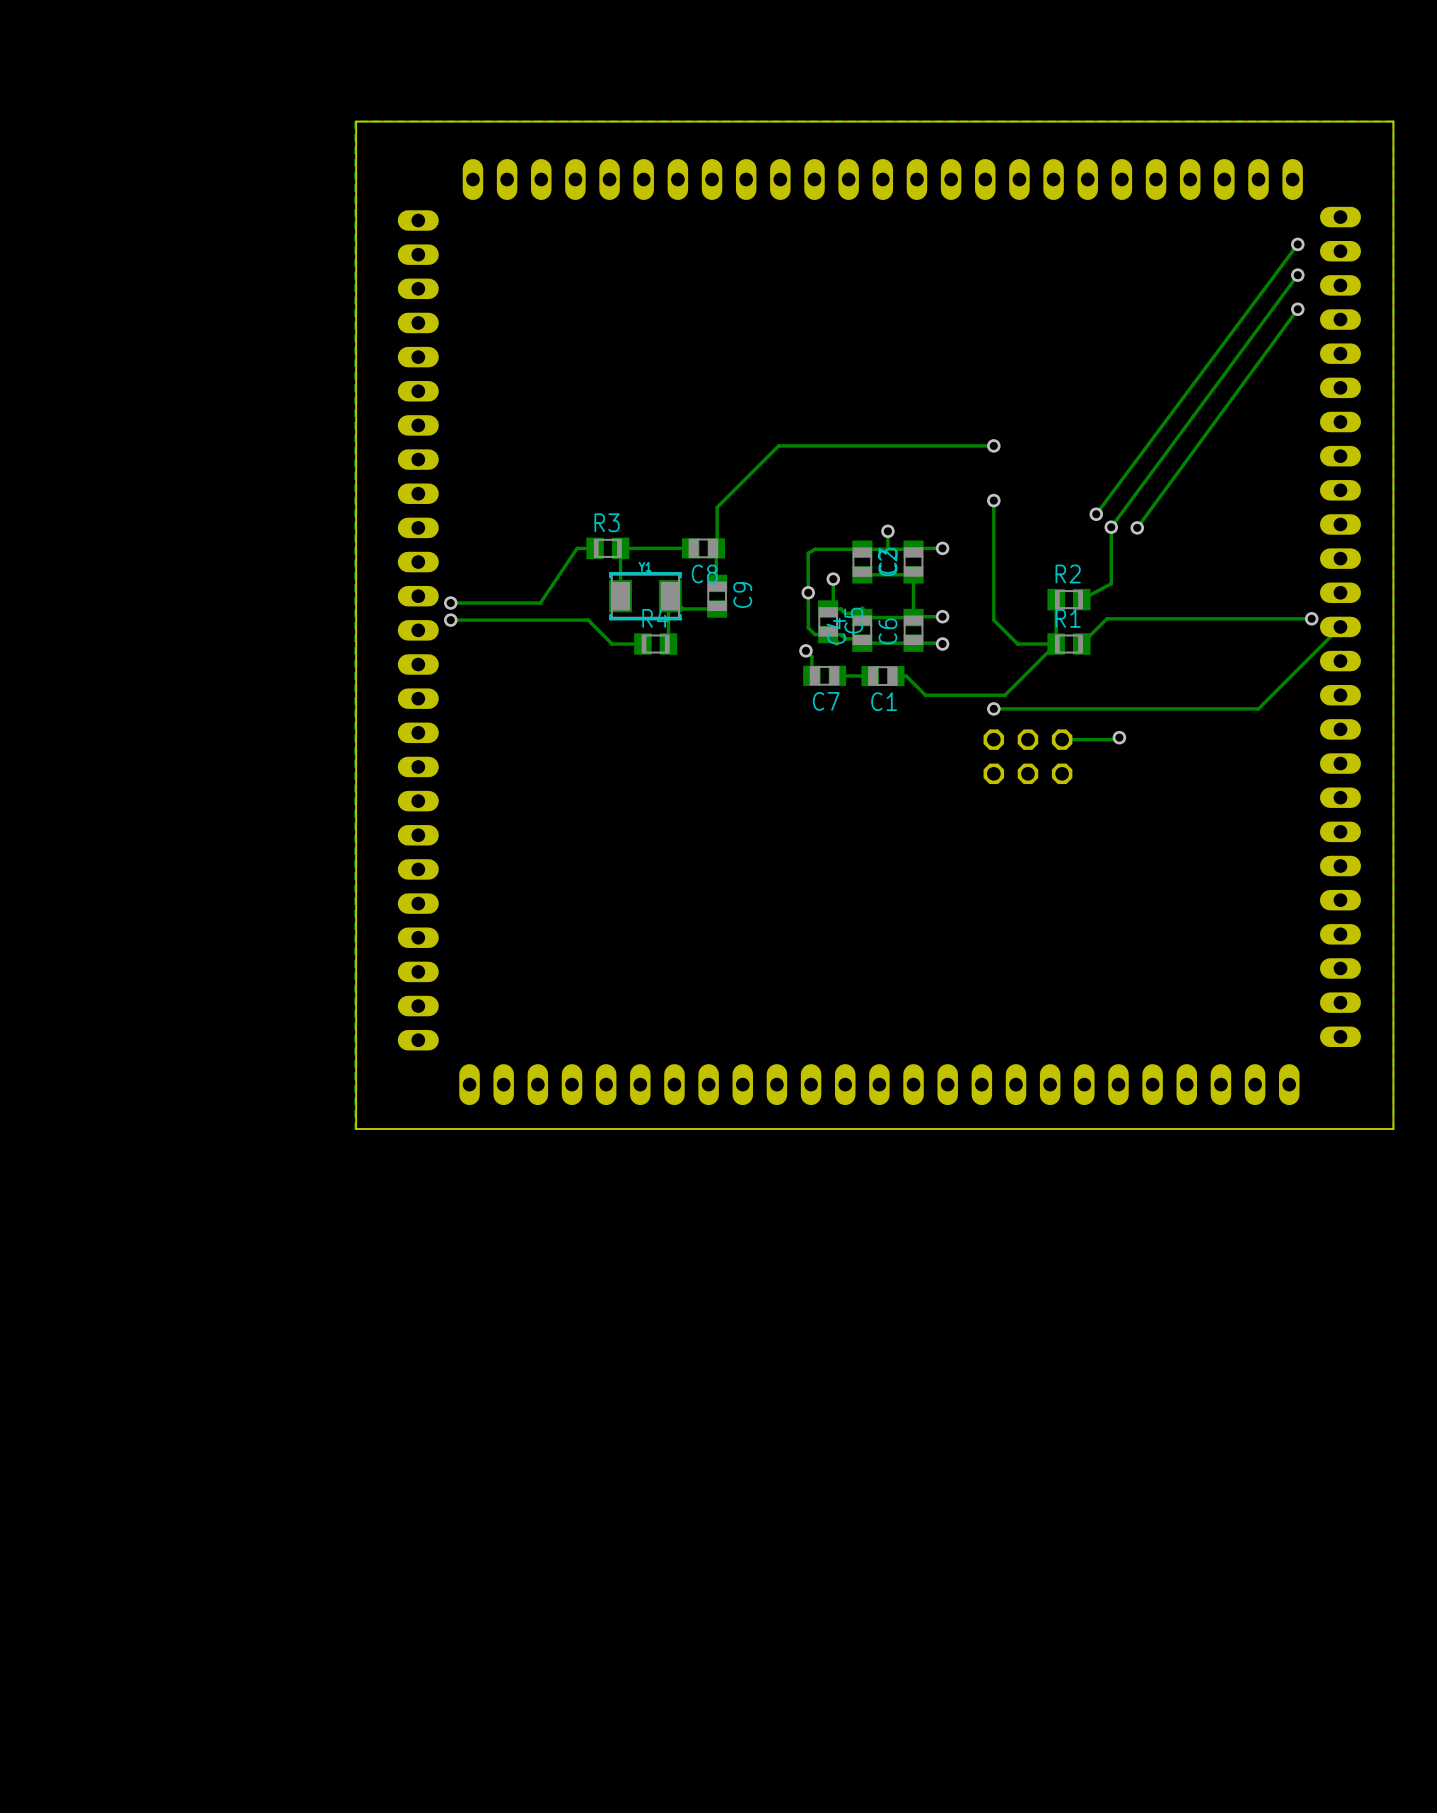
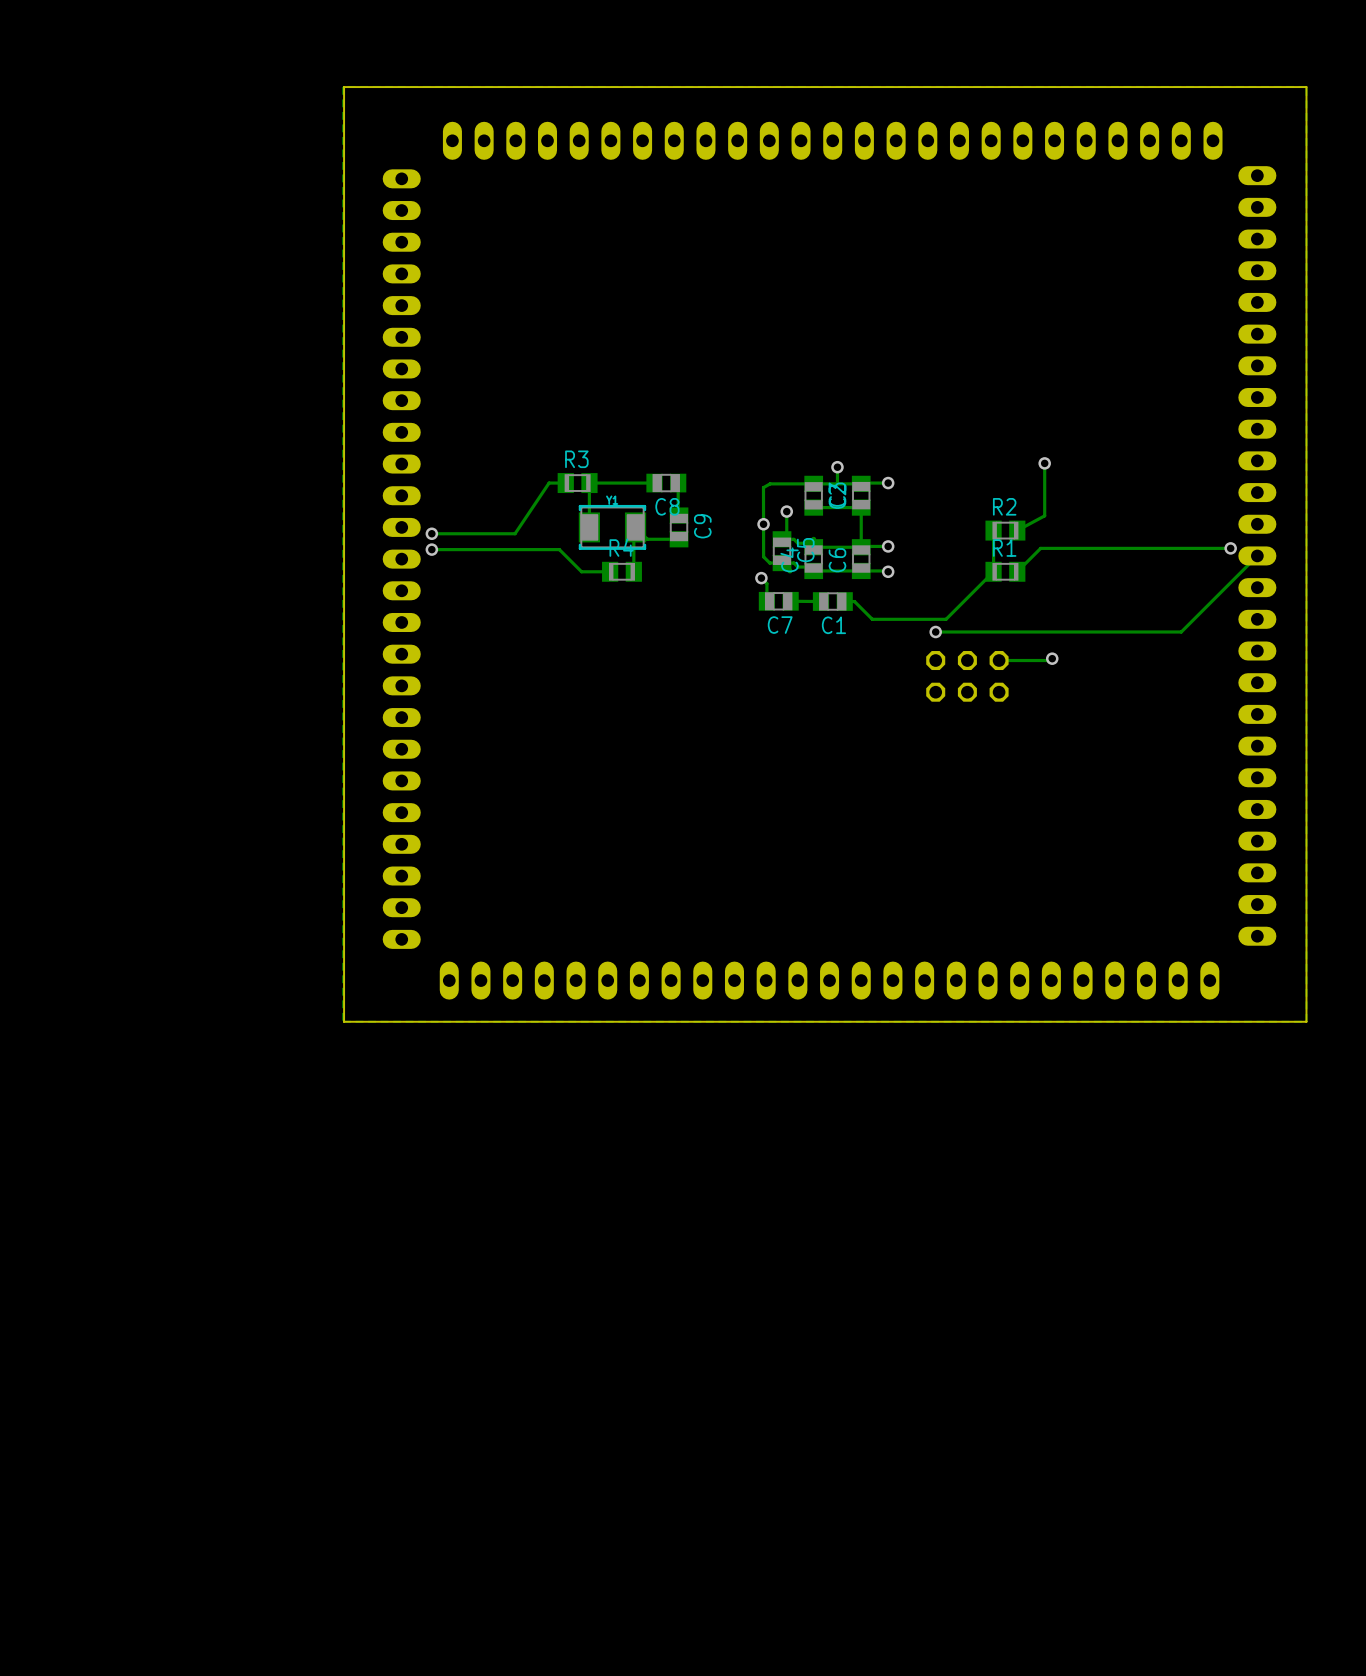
track: (1297, 244) (1096, 514) -> none
via: (1297, 244) -> none
track: (1297, 275) (1111, 527) -> none
via: (1297, 275) -> none
track: (1297, 309) (1137, 527) -> none
via: (1297, 309) -> none
track: (993, 445) (778, 445) (717, 507) (716, 548) -> none
via: (993, 445) -> none
track: (993, 500) (993, 620) (1017, 644) (1056, 644) -> none
via: (993, 500) -> none
via: (1096, 514) -> none
via: (1137, 527) -> none

